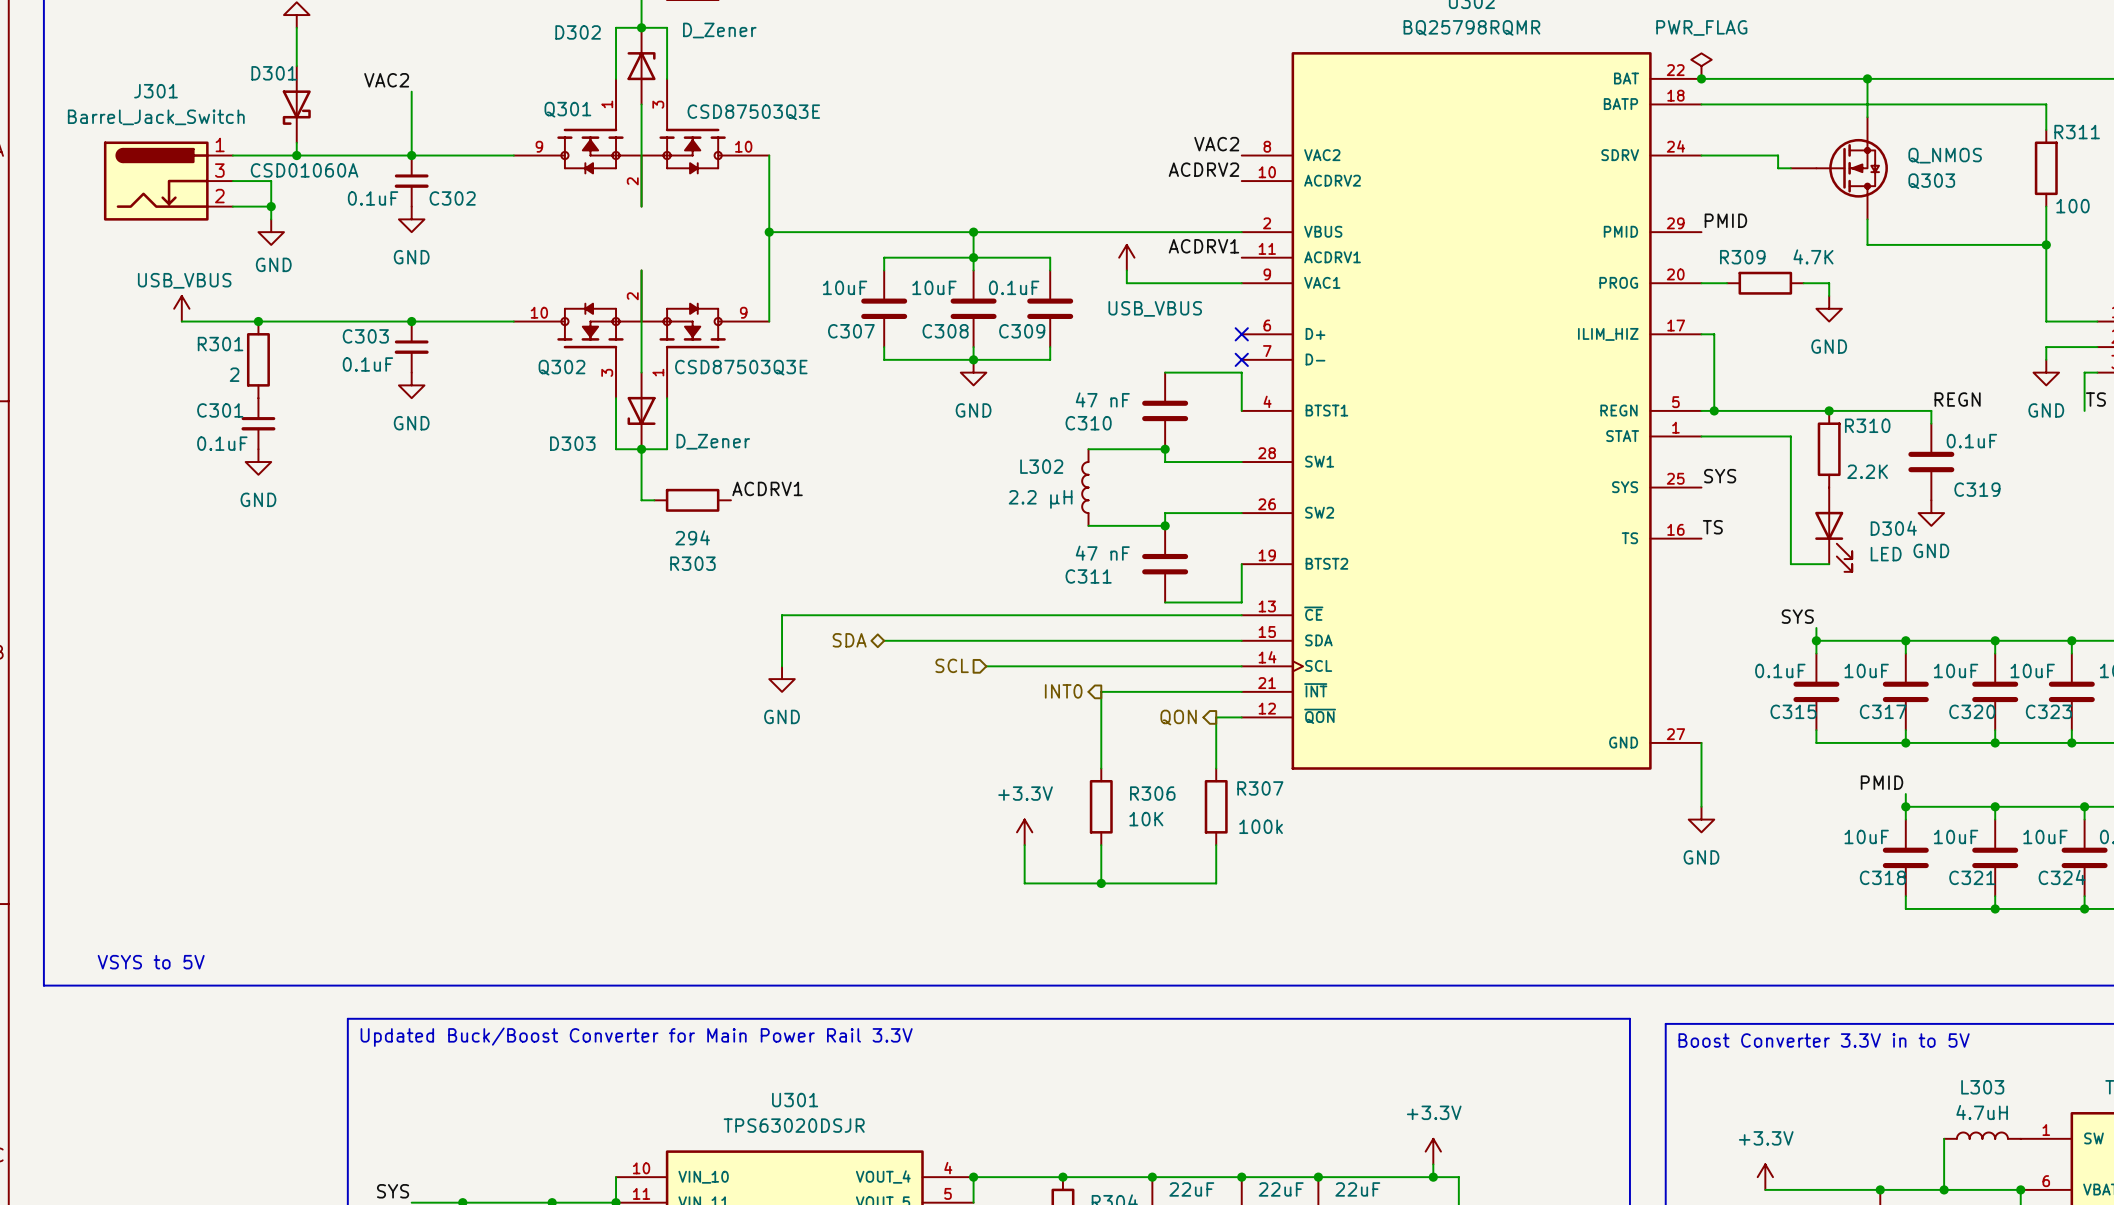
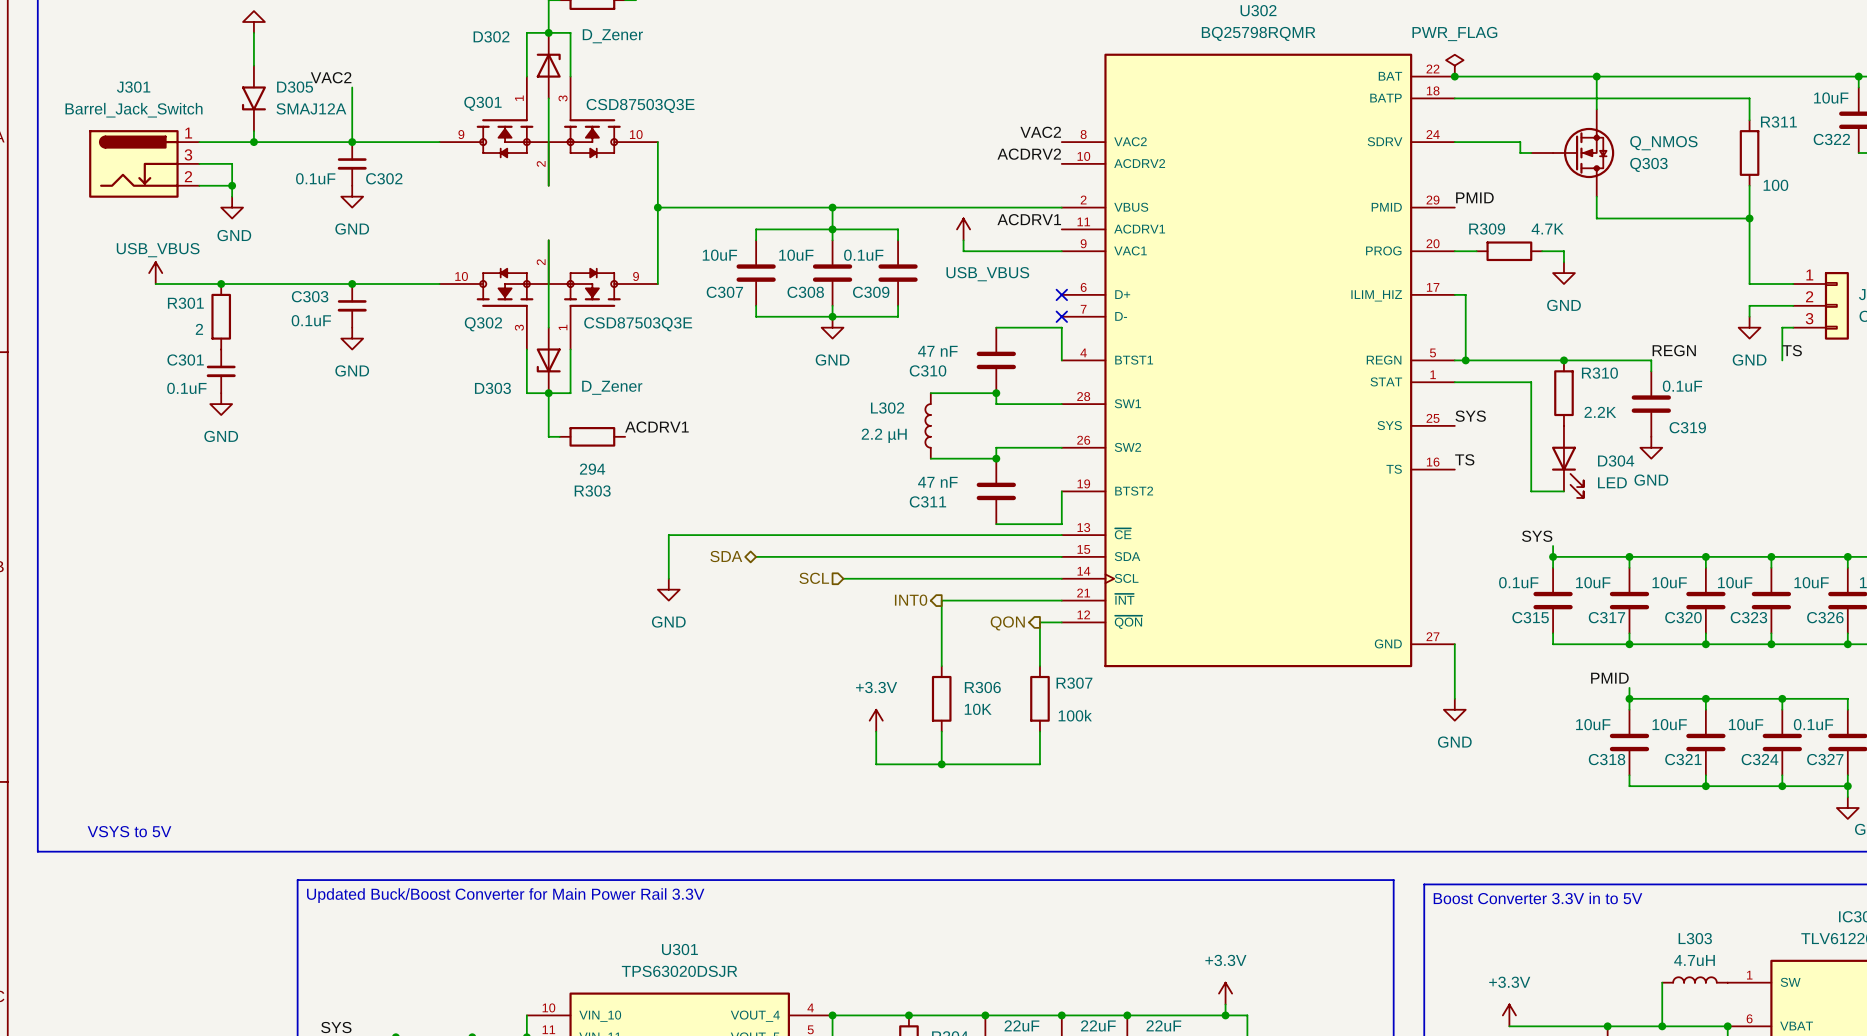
D301: CSD01060A (296, 104) -> none
D305: none -> SMAJ12A (253, 98)

